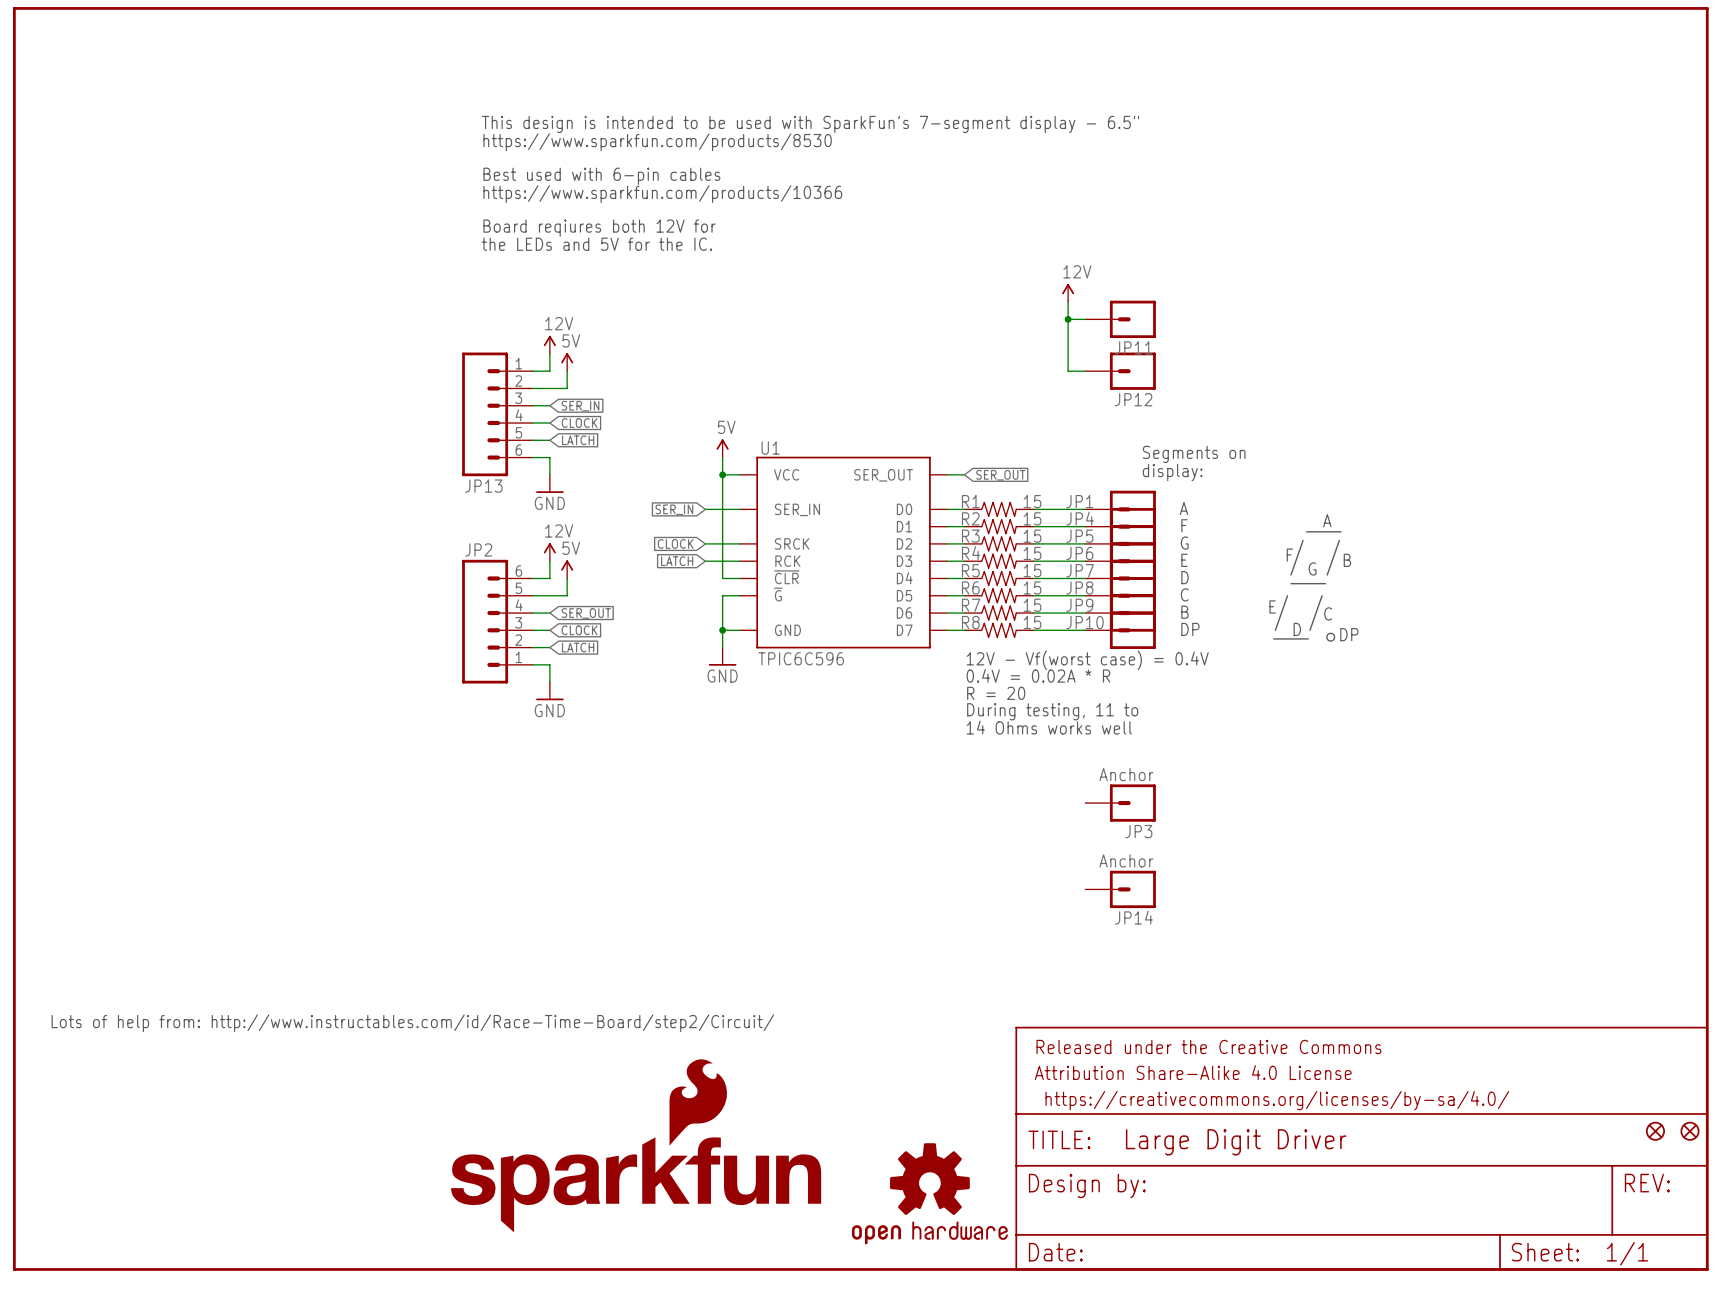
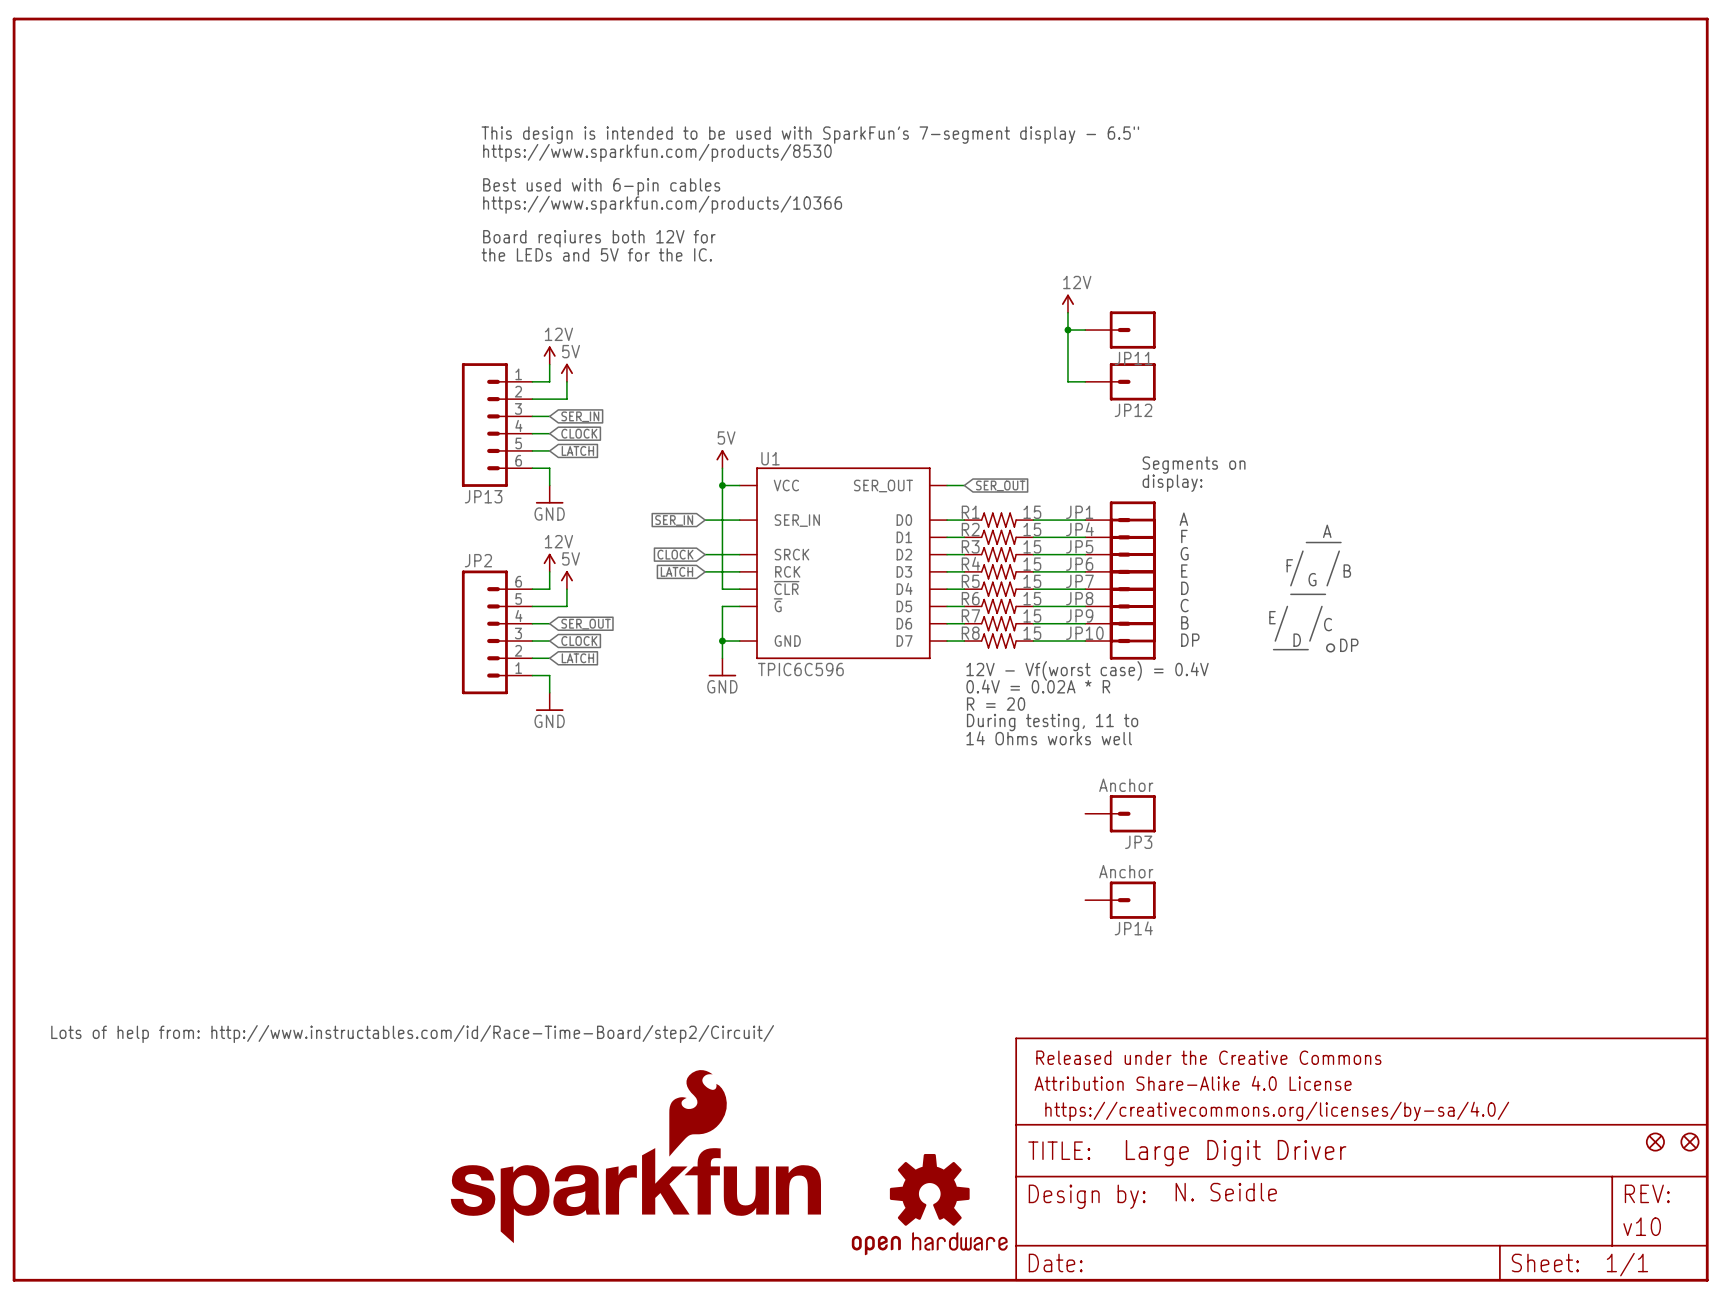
part text: none -> N. Seidle (1226, 1192)
part text: none -> v10 (1642, 1226)

